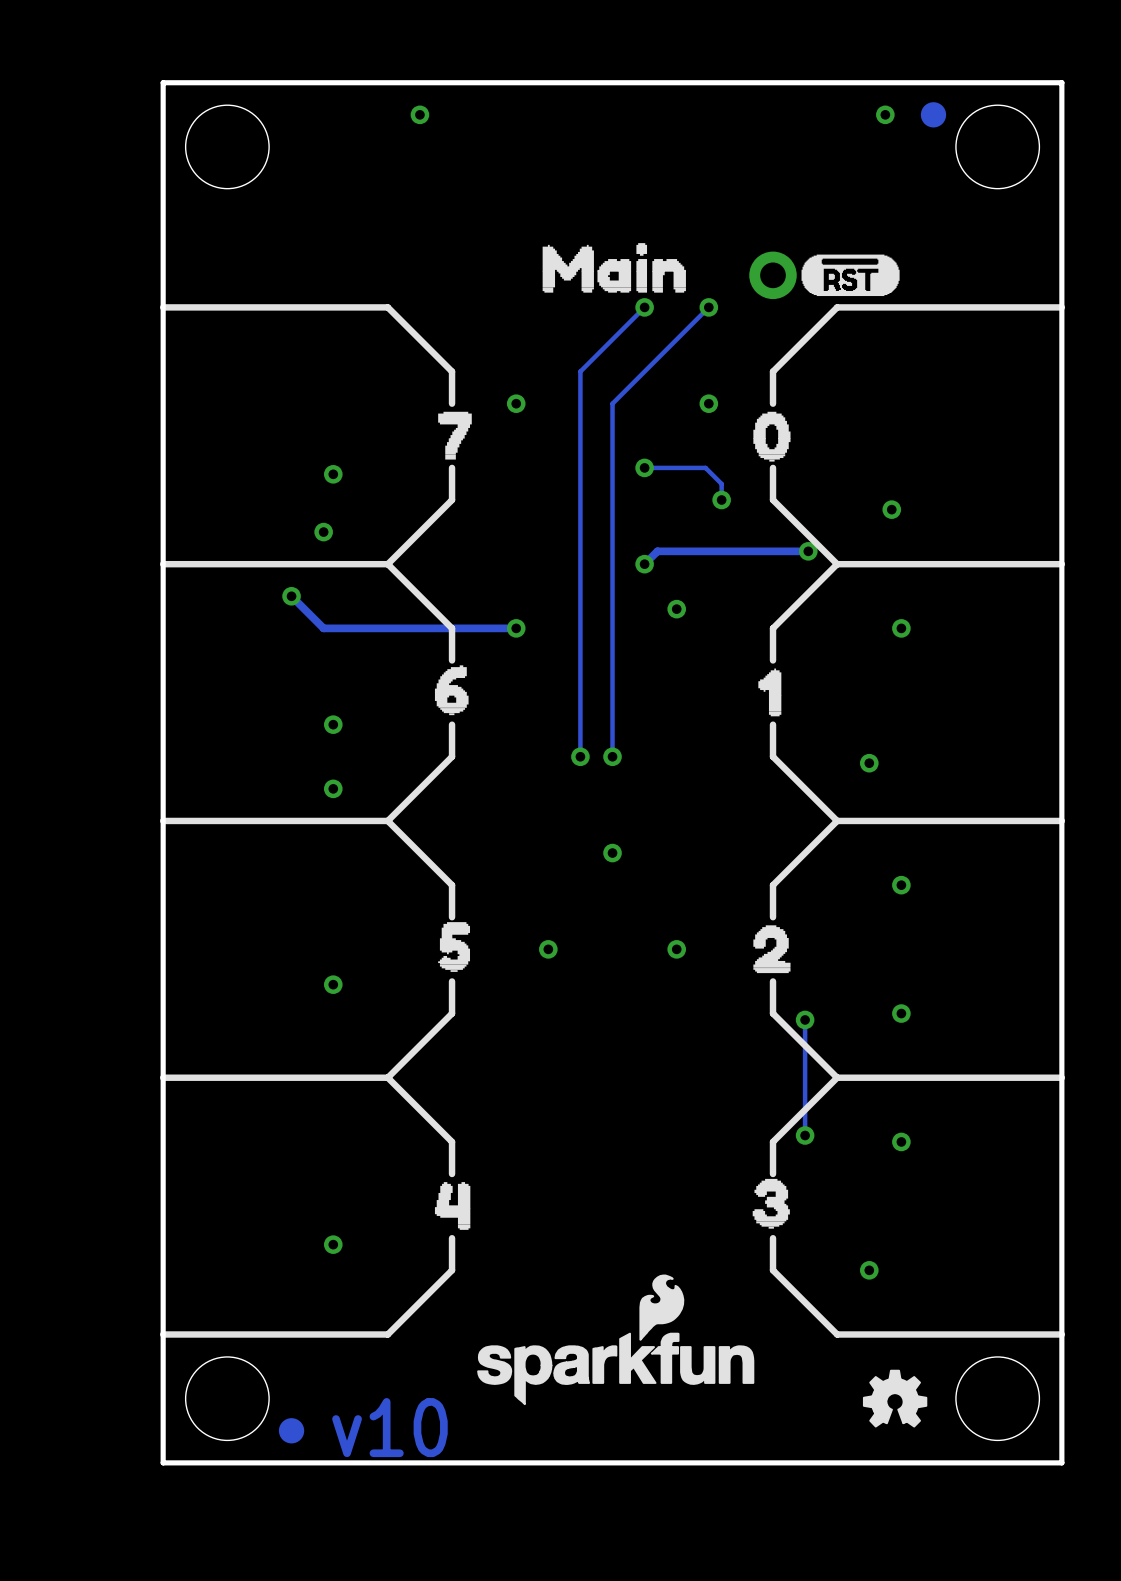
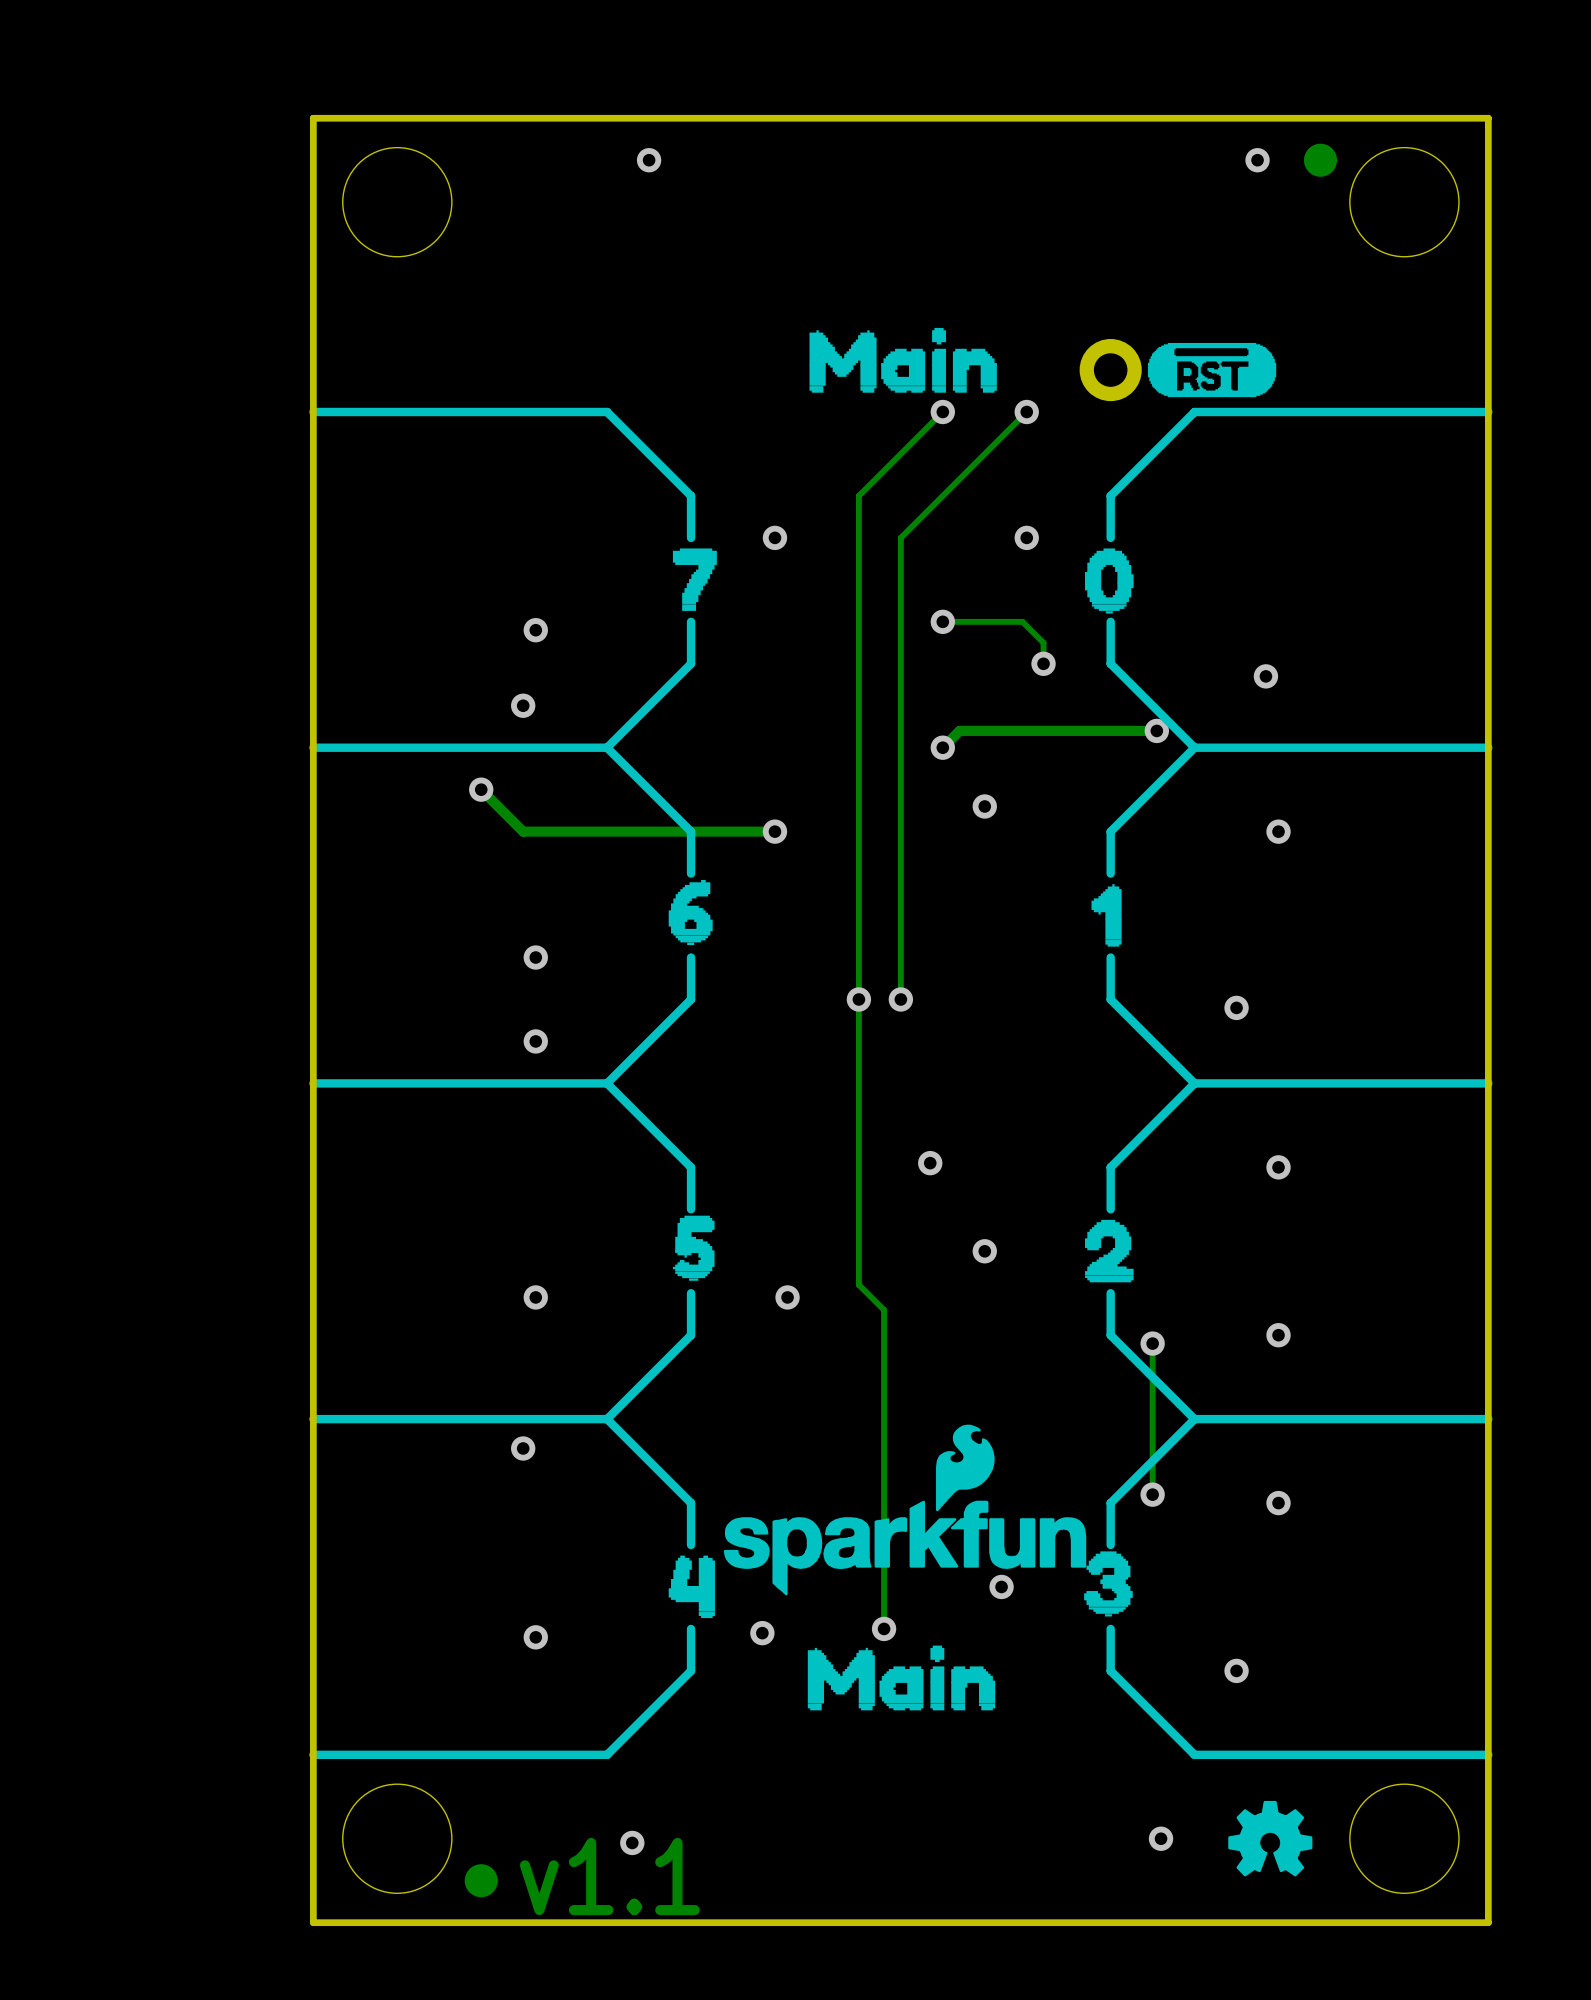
track: none -> (858, 999) (858, 1284) (884, 1310) (884, 1628)
via position: (612, 853) -> (930, 1163)
via position: (548, 949) -> (787, 1297)
via: none -> (523, 1448)
via: none -> (1001, 1586)
via: none -> (884, 1628)
via: none -> (762, 1633)
drawing: none -> [807, 1645, 996, 1711]
drawing position: (615, 1339) -> (905, 1510)
via: none -> (1161, 1838)
via: none -> (632, 1842)
text: v10 (389, 1427) -> v1.1 (609, 1876)

